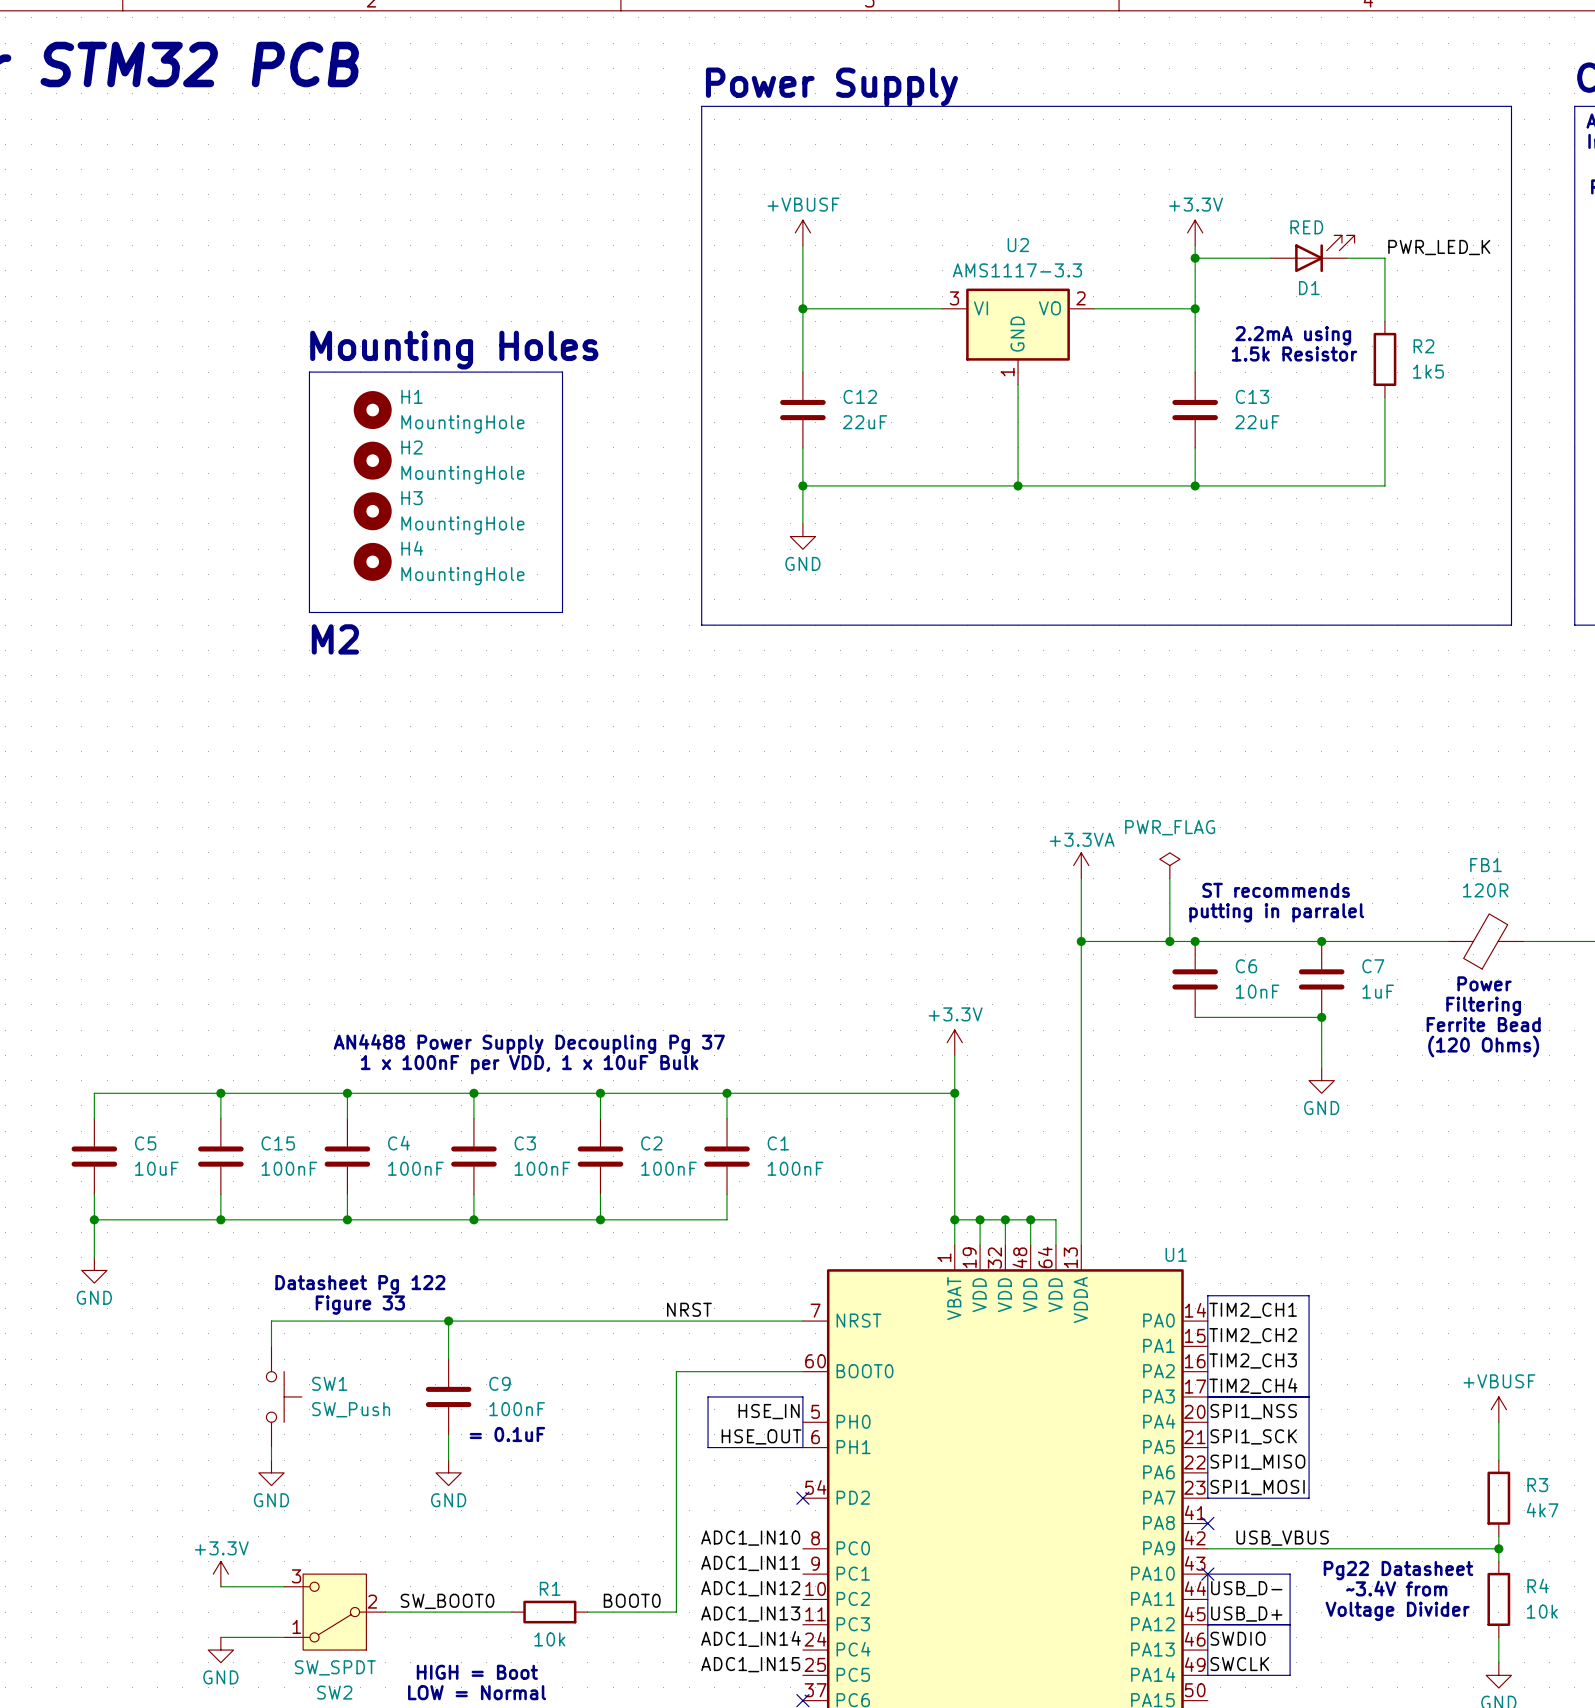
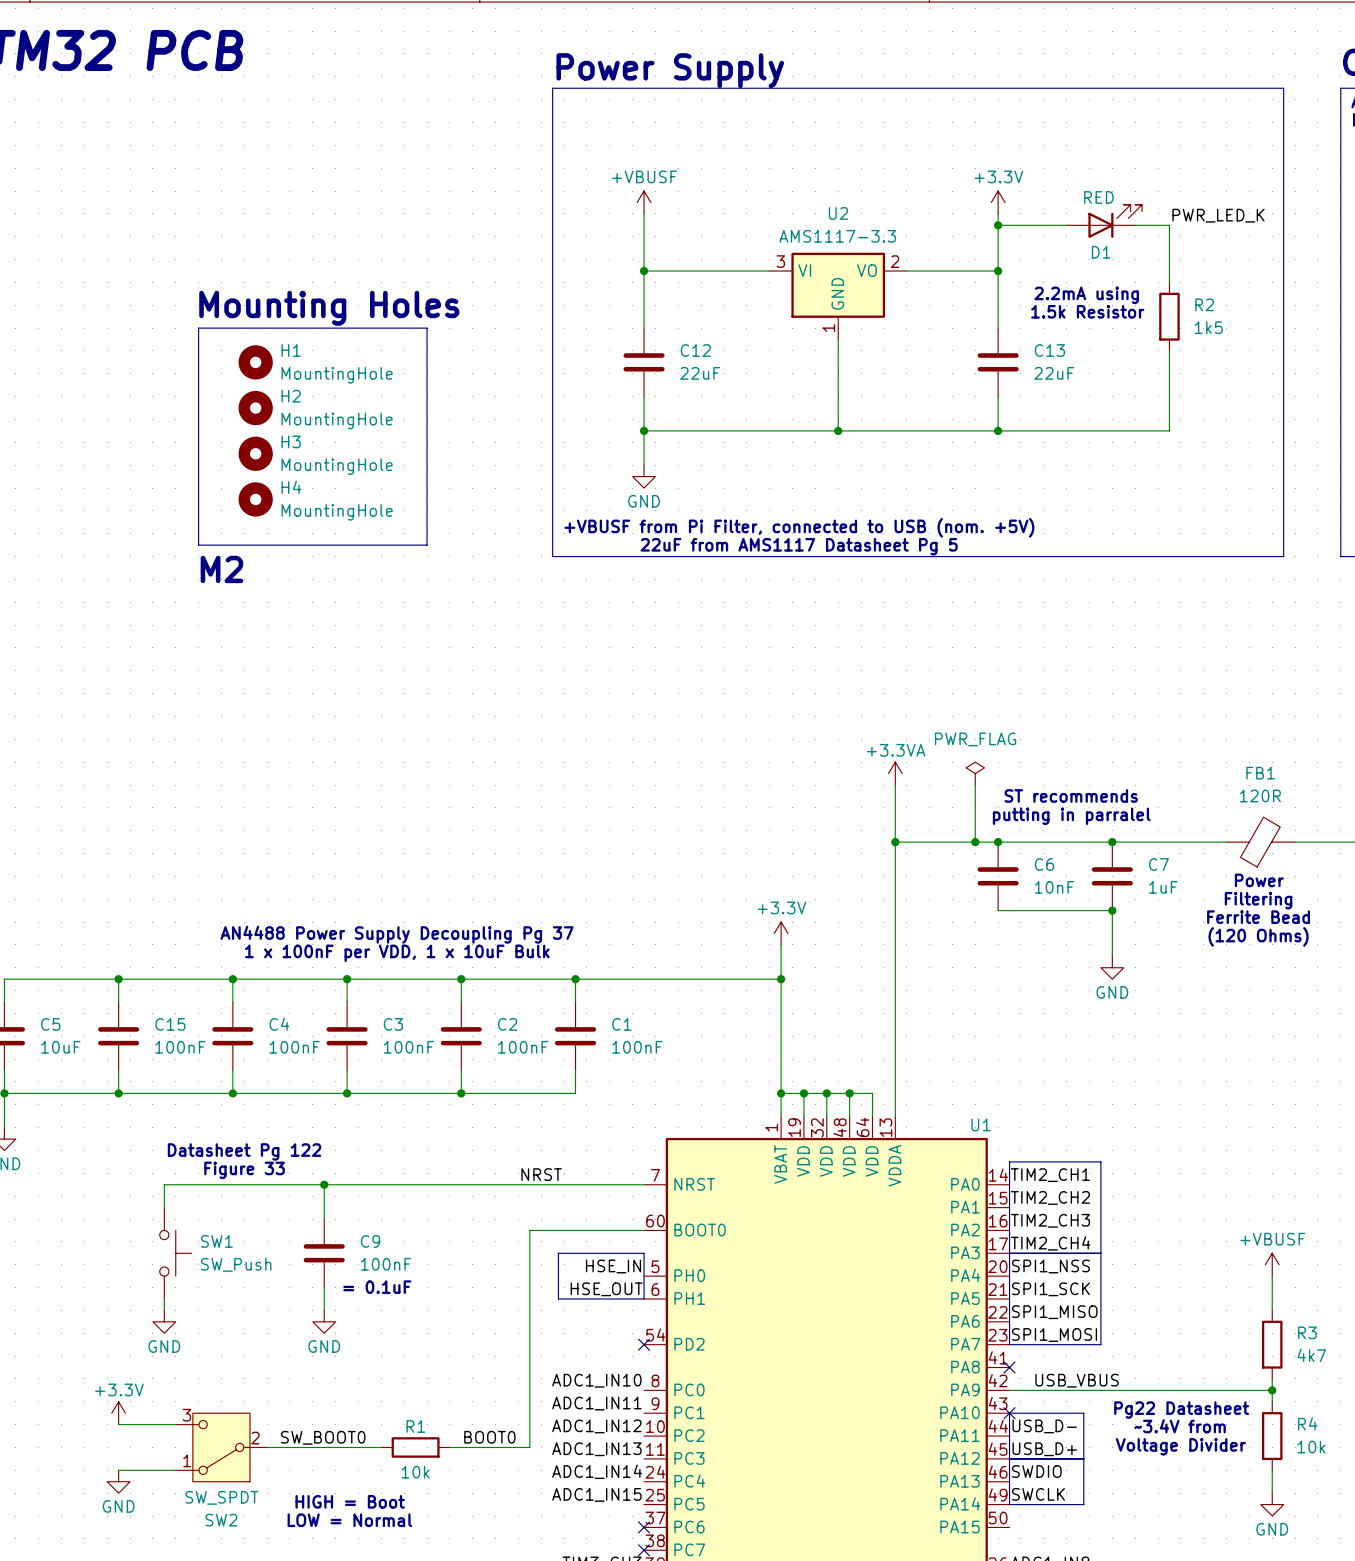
text: none -> +VBUSF from Pi Filter, connected to USB (nom. +5V) (799, 527)
text: none -> 22uF from AMS1117 Datasheet Pg 5 (799, 546)

